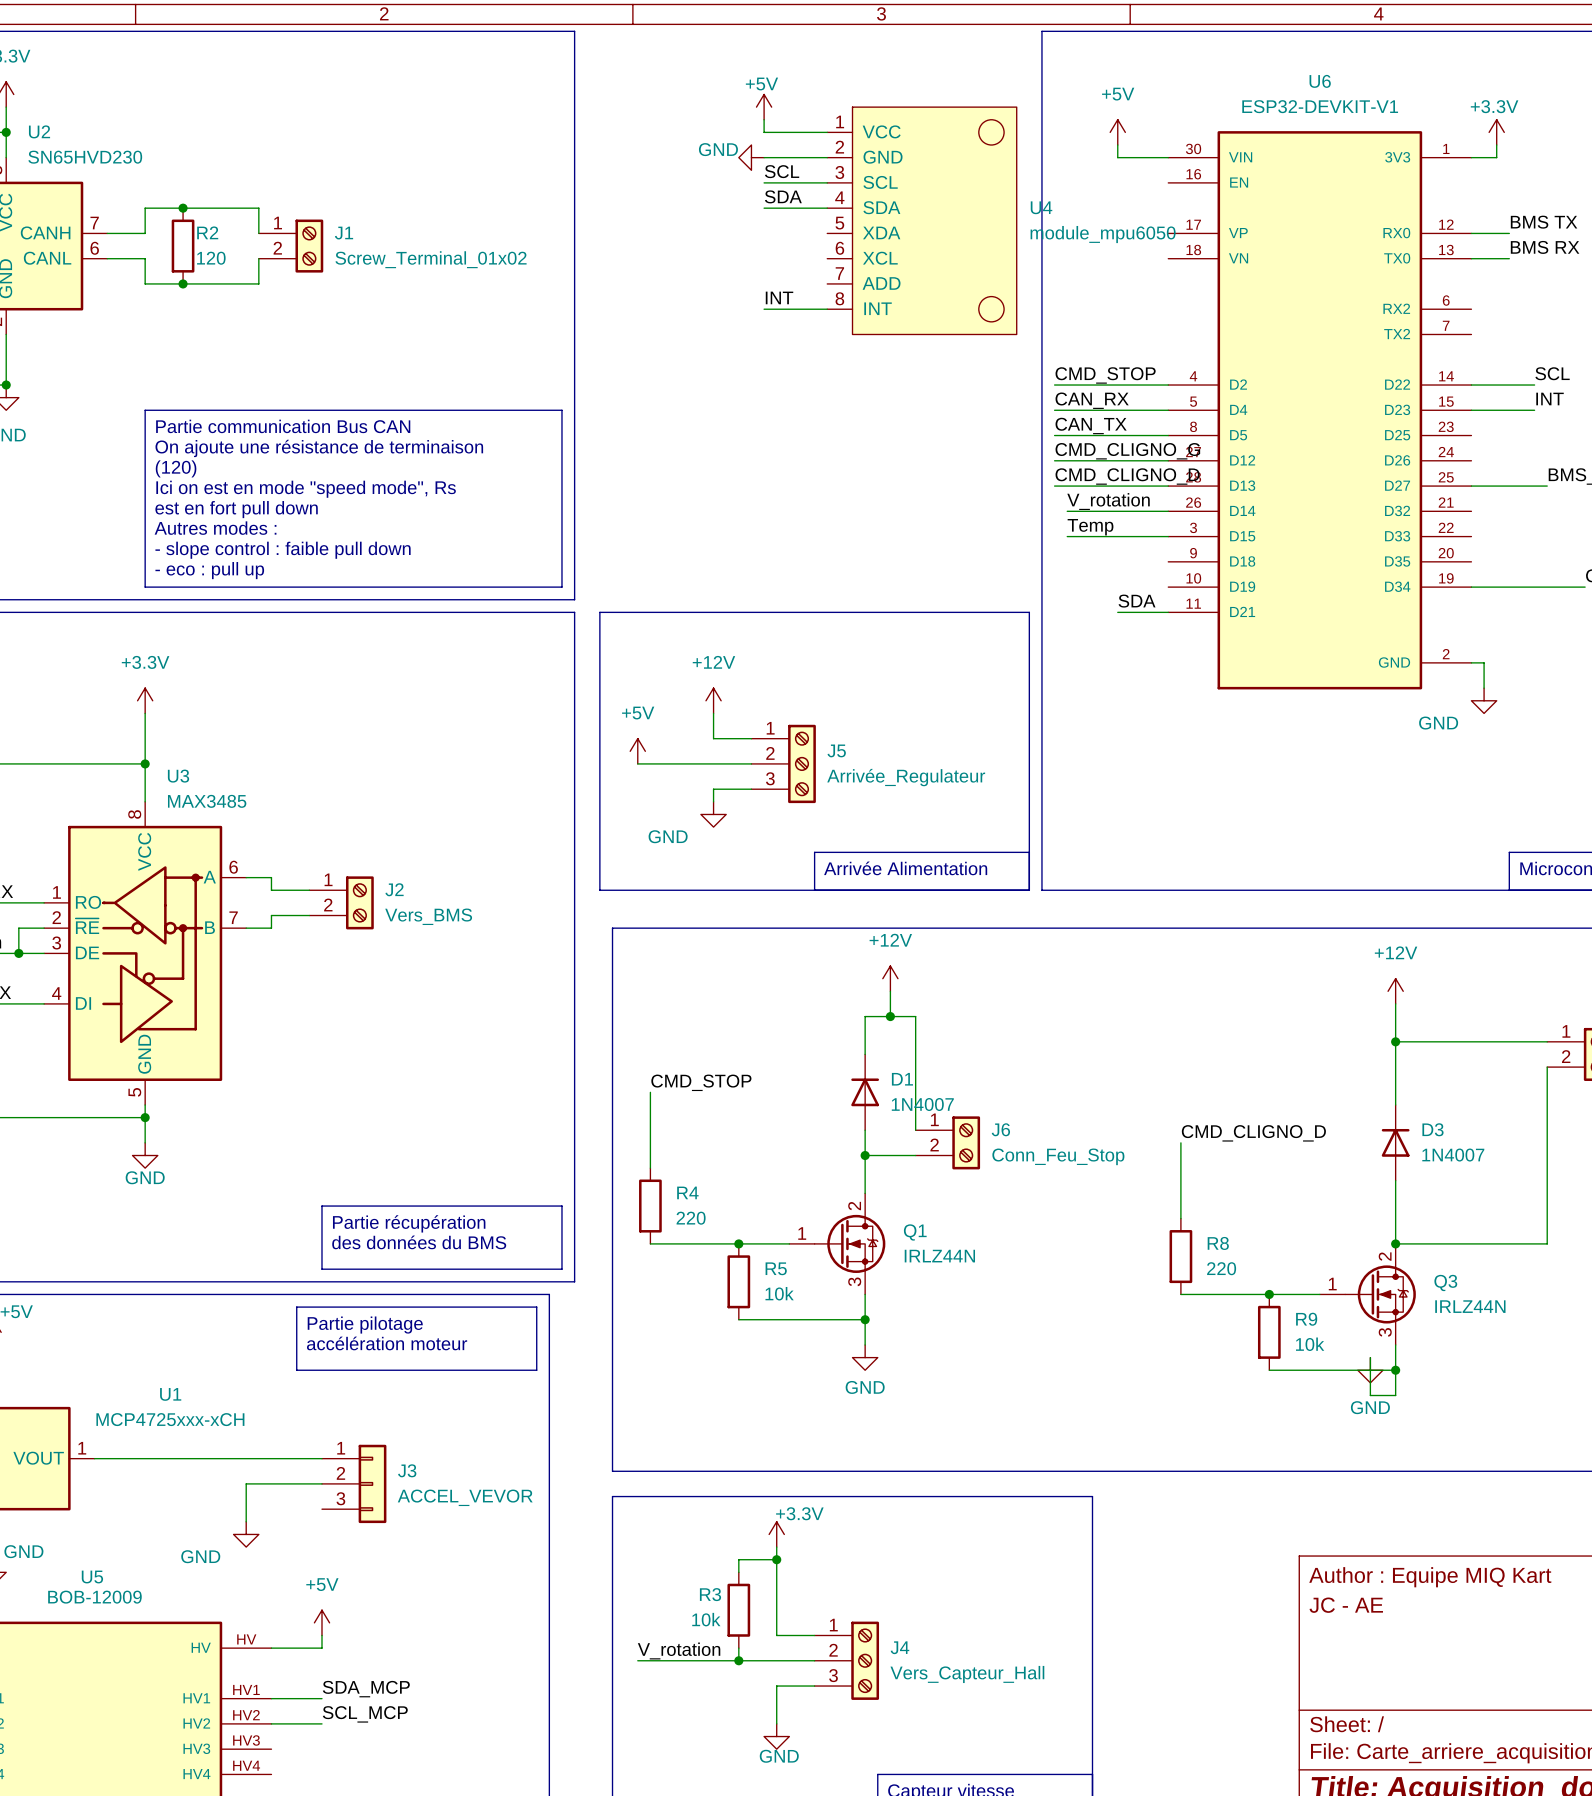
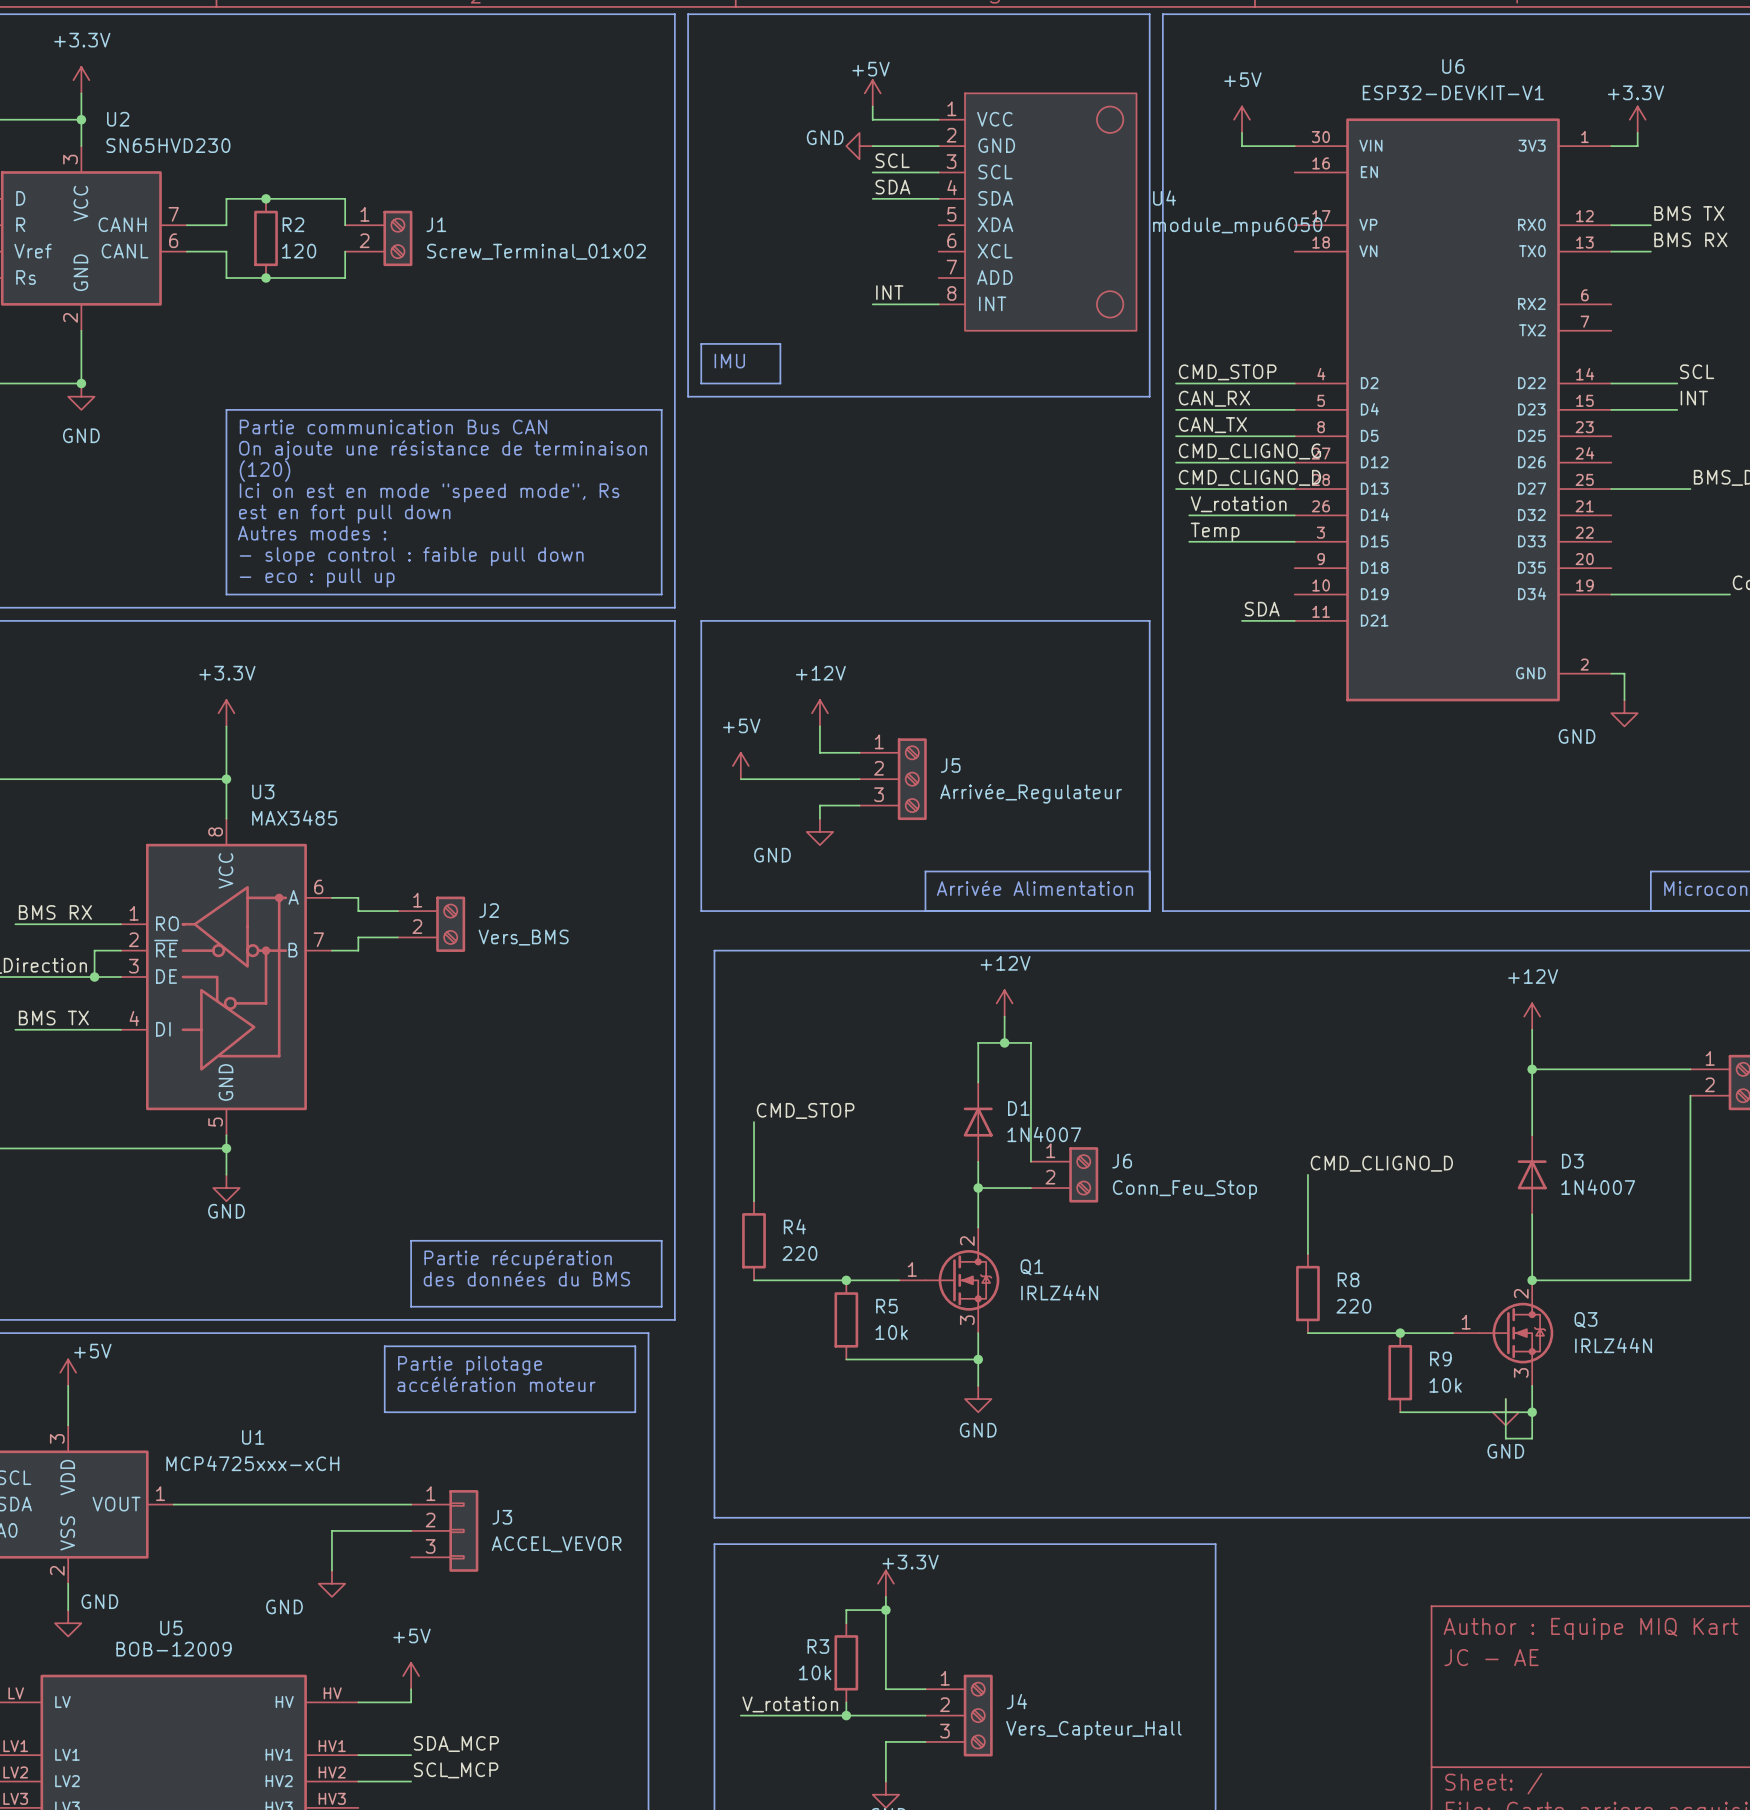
line: none -> (688, 14) (1149, 14) (1149, 396) (688, 396) (688, 14)
line: none -> (701, 343) (780, 343) (780, 383) (701, 383) (701, 343)
text: none -> IMU (729, 361)

